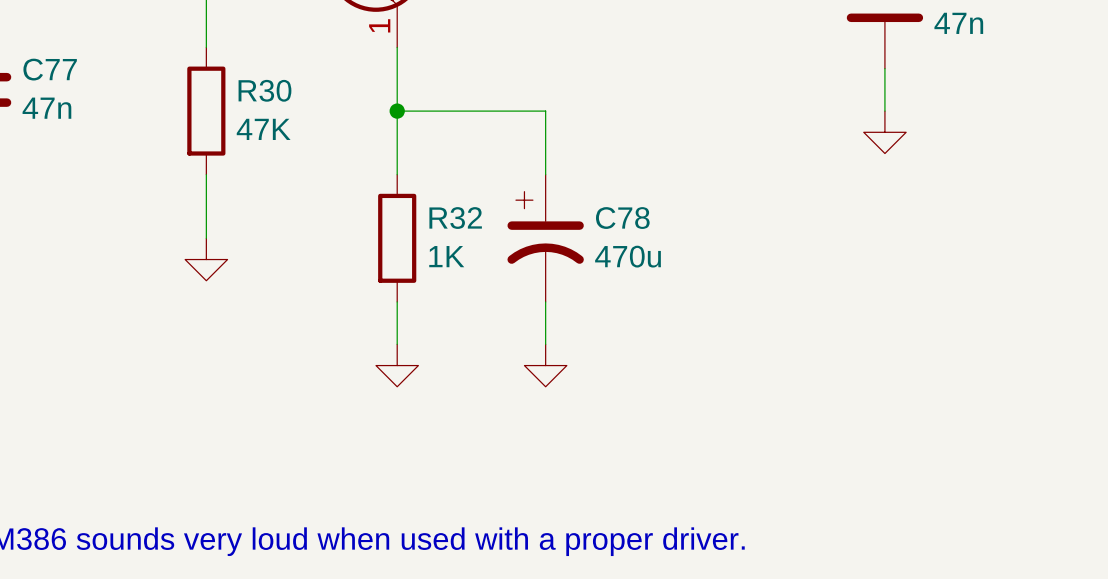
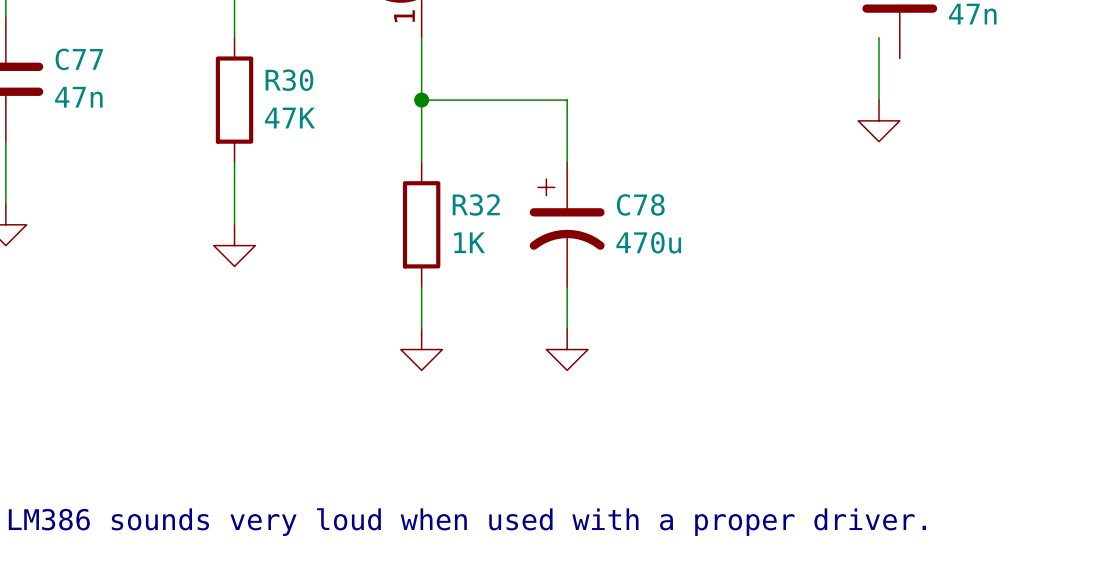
wire: none -> (878, 37) (878, 100)
wire: (884, 68) (884, 111) -> none
power symbol position: (884, 132) -> (878, 120)

